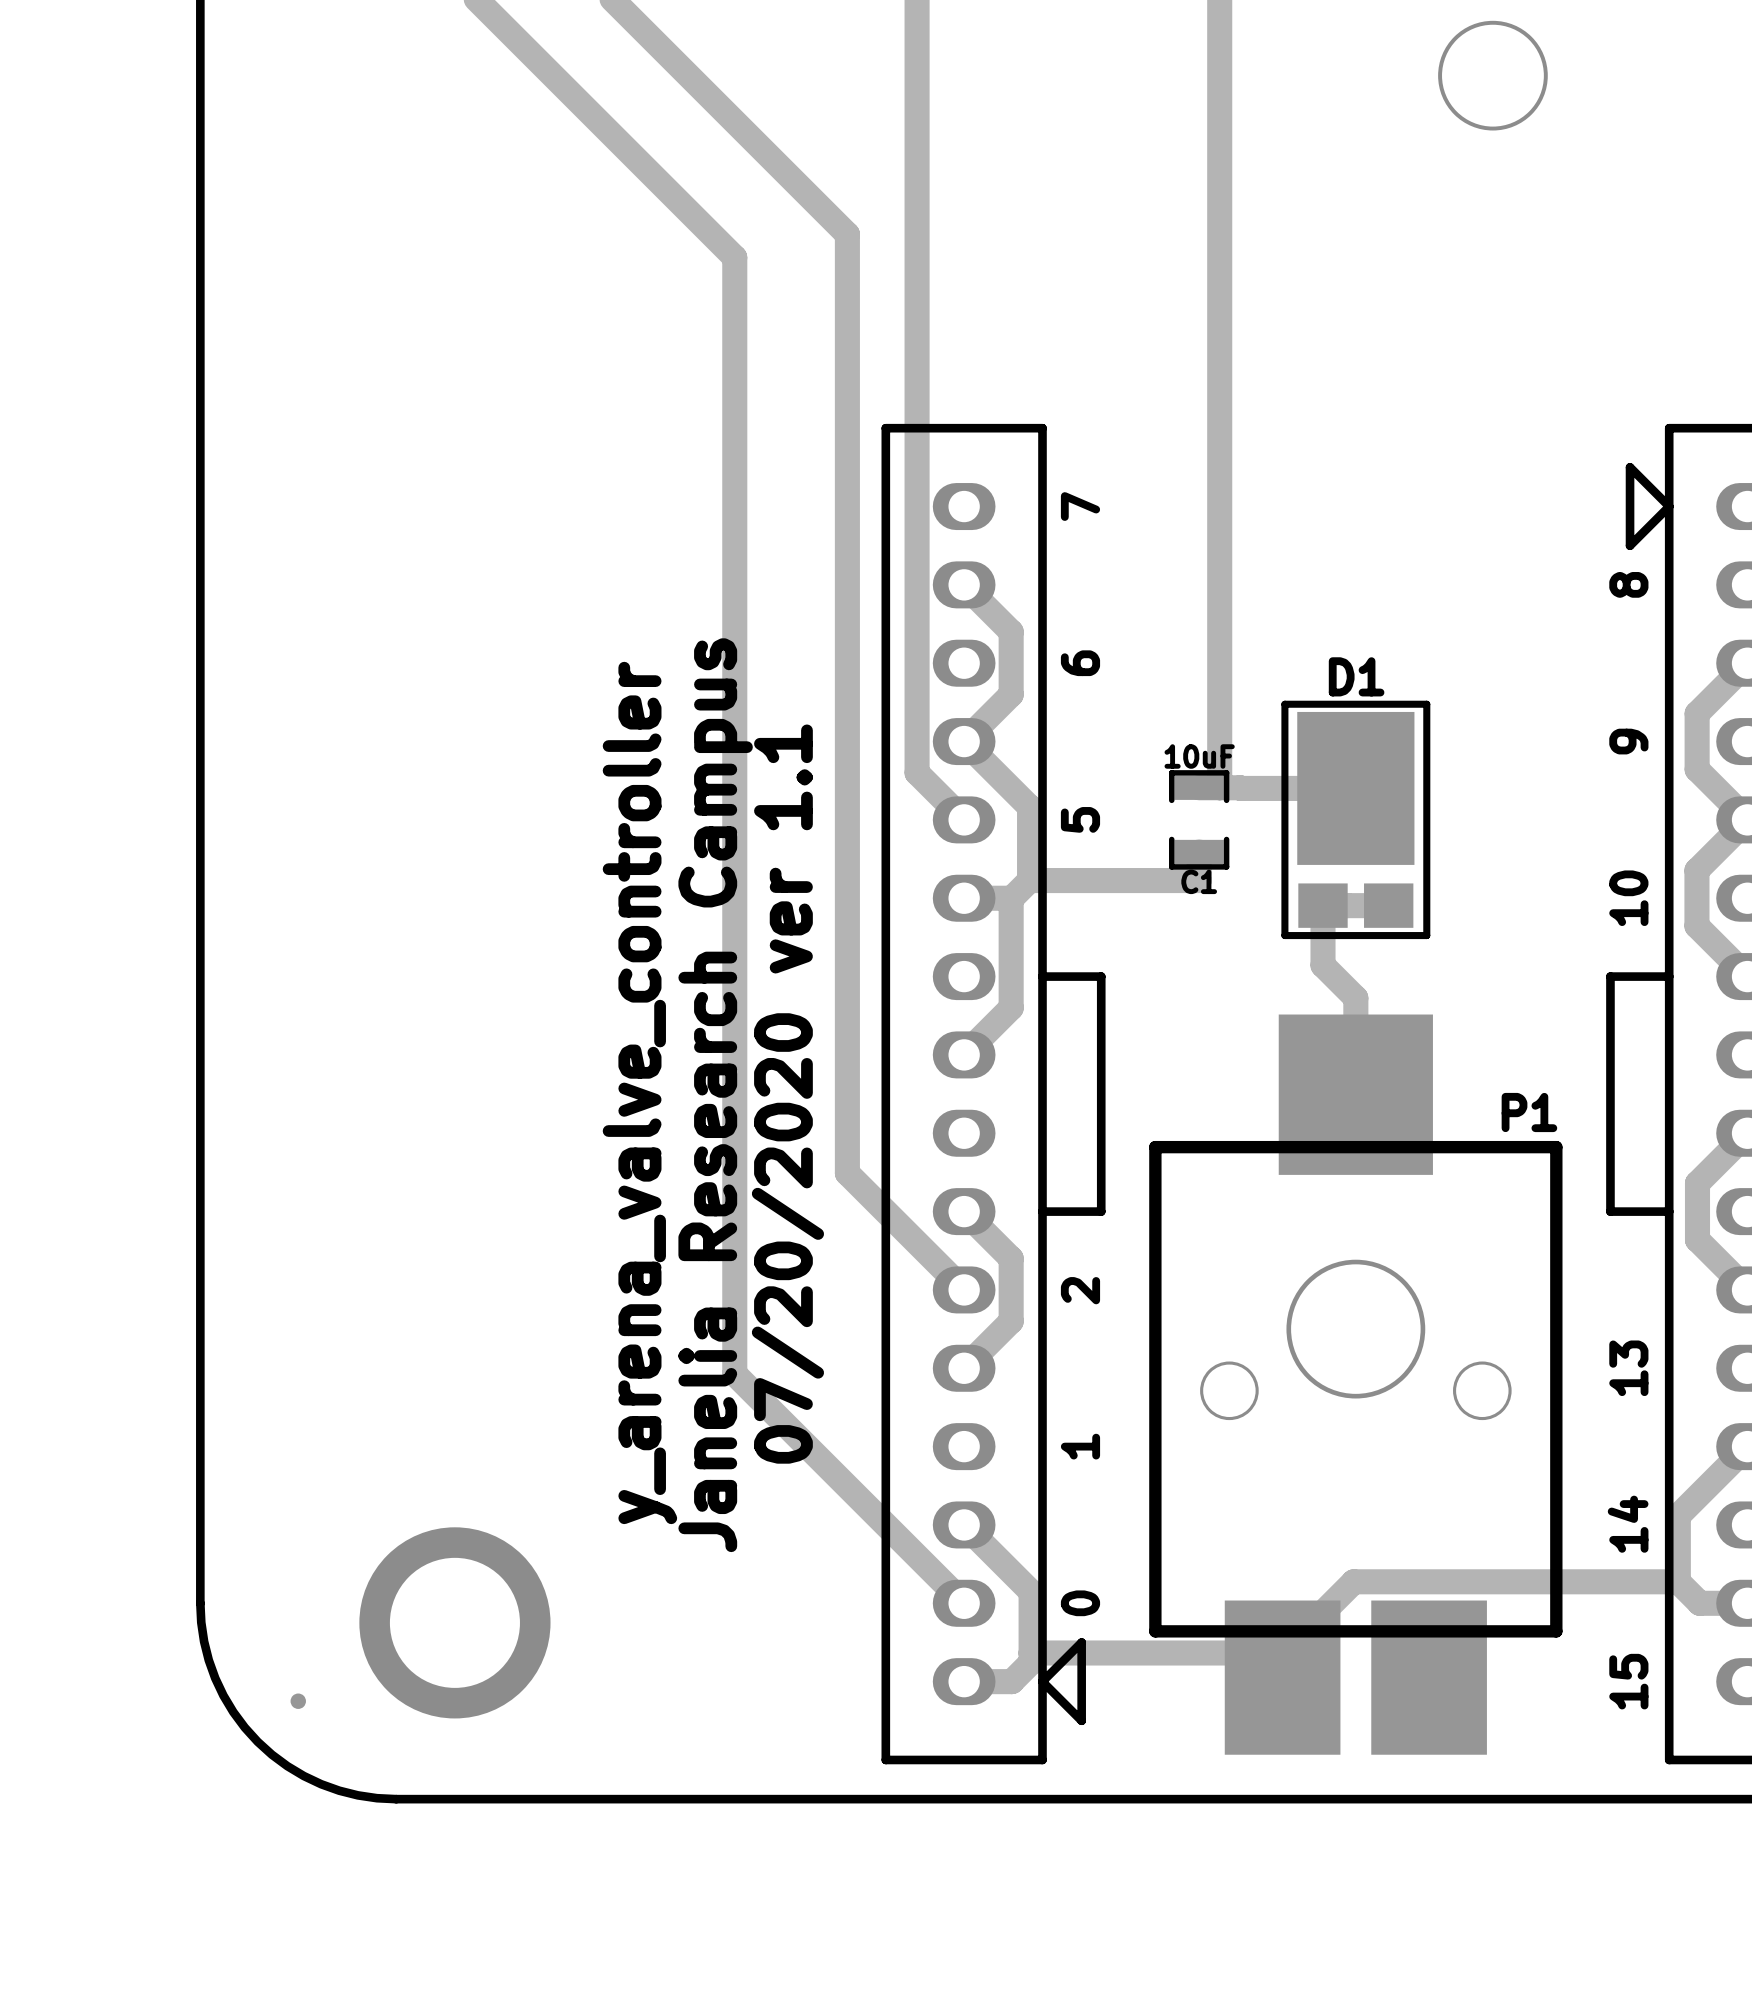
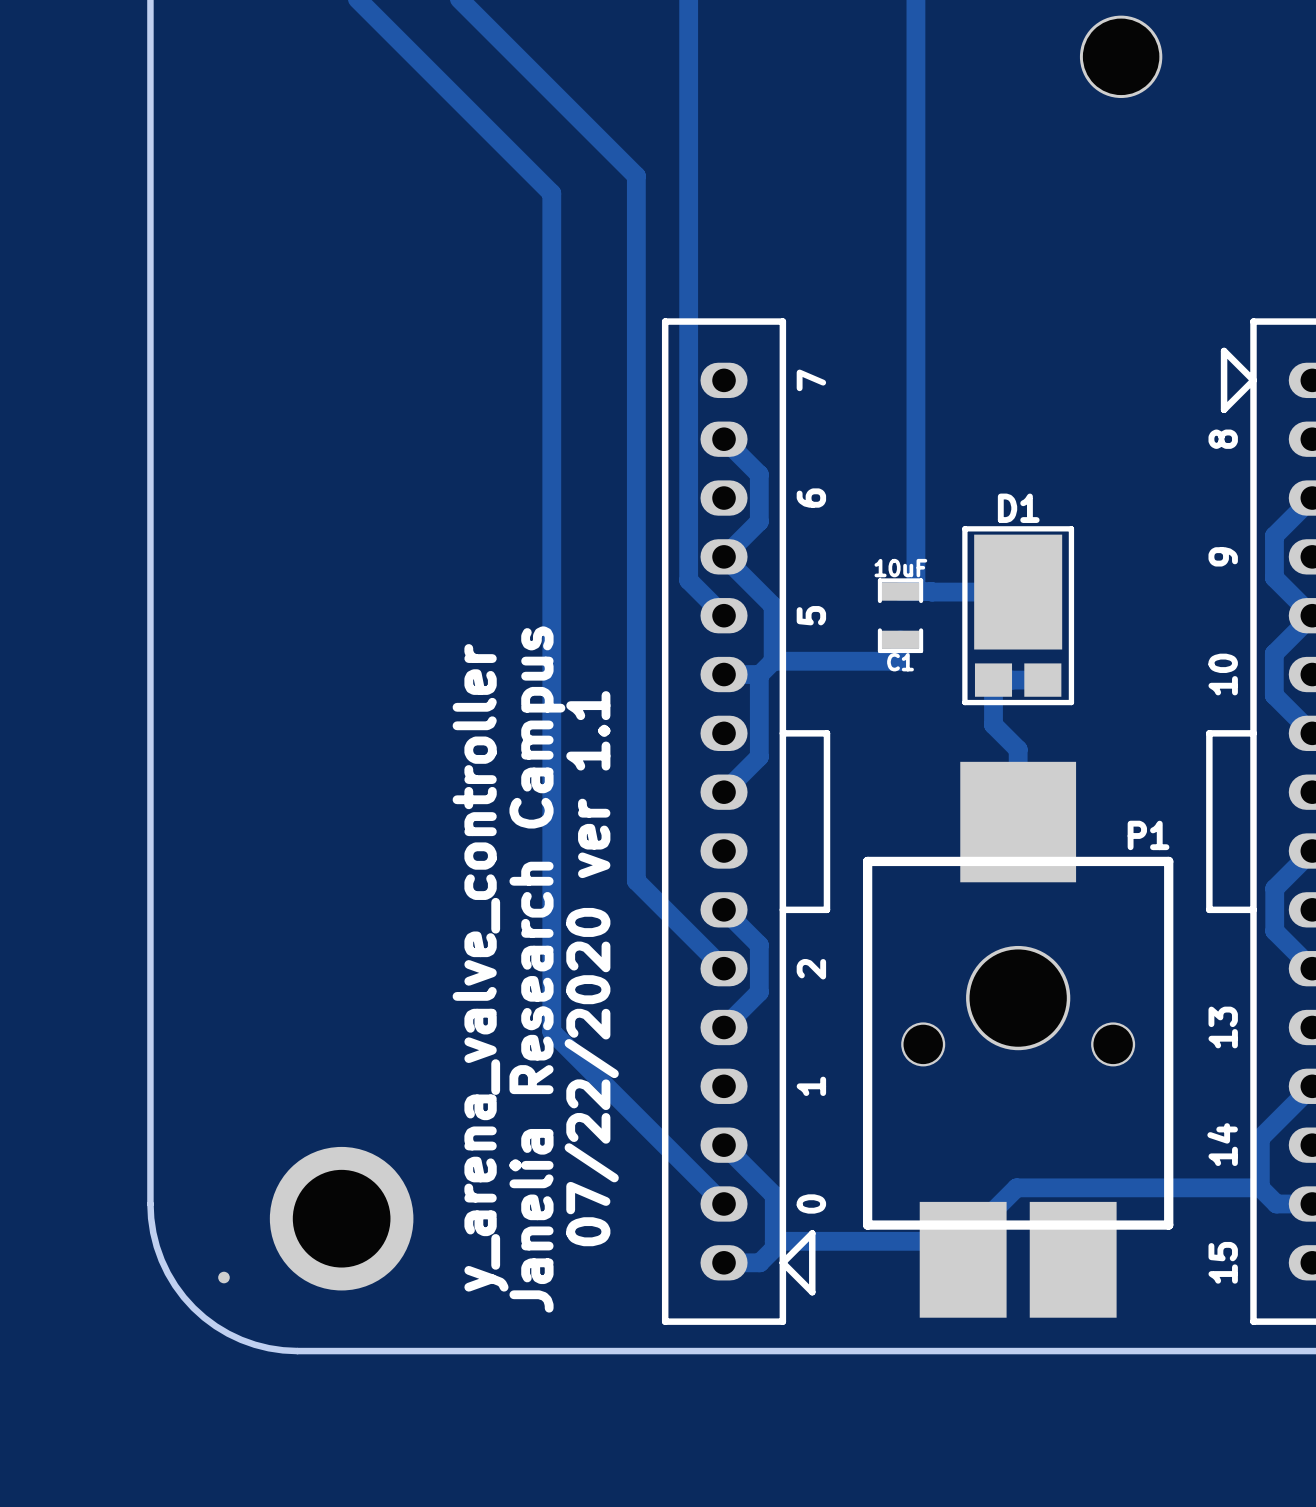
text position: y_arena_valve_controller (639, 1092) -> y_arena_valve_controller (480, 967)
text: 07/20/2020 ver 1.1 (787, 1094) -> 07/22/2020 ver 1.1 (591, 968)
text position: Janelia Research Campus (715, 1095) -> Janelia Research Campus (537, 969)

